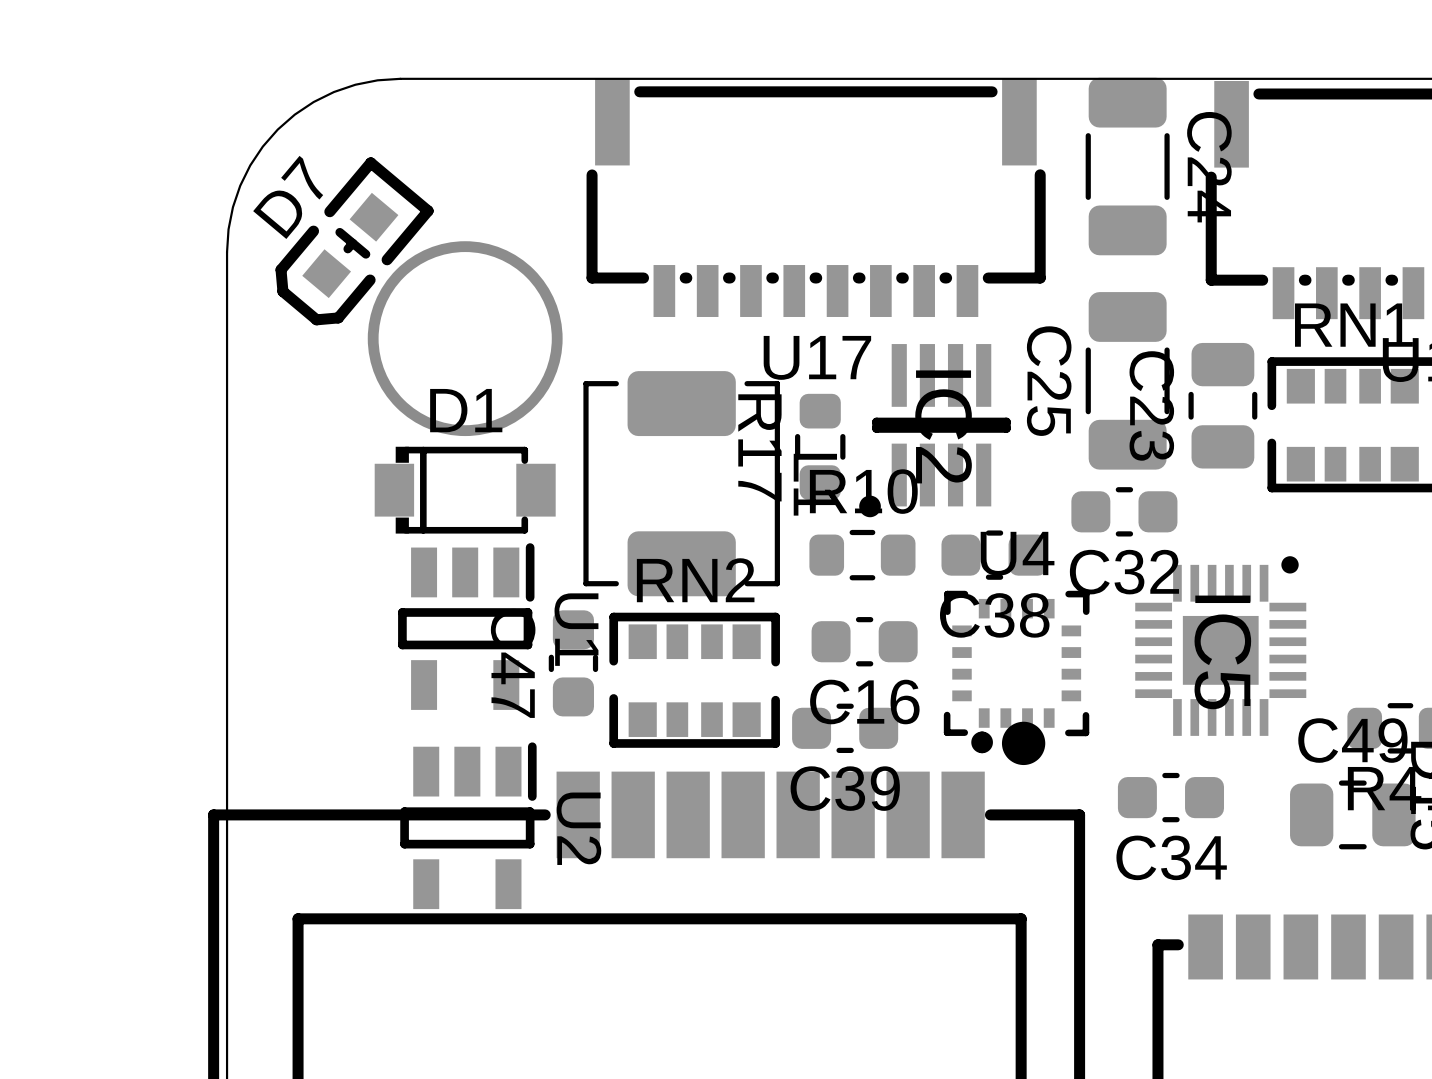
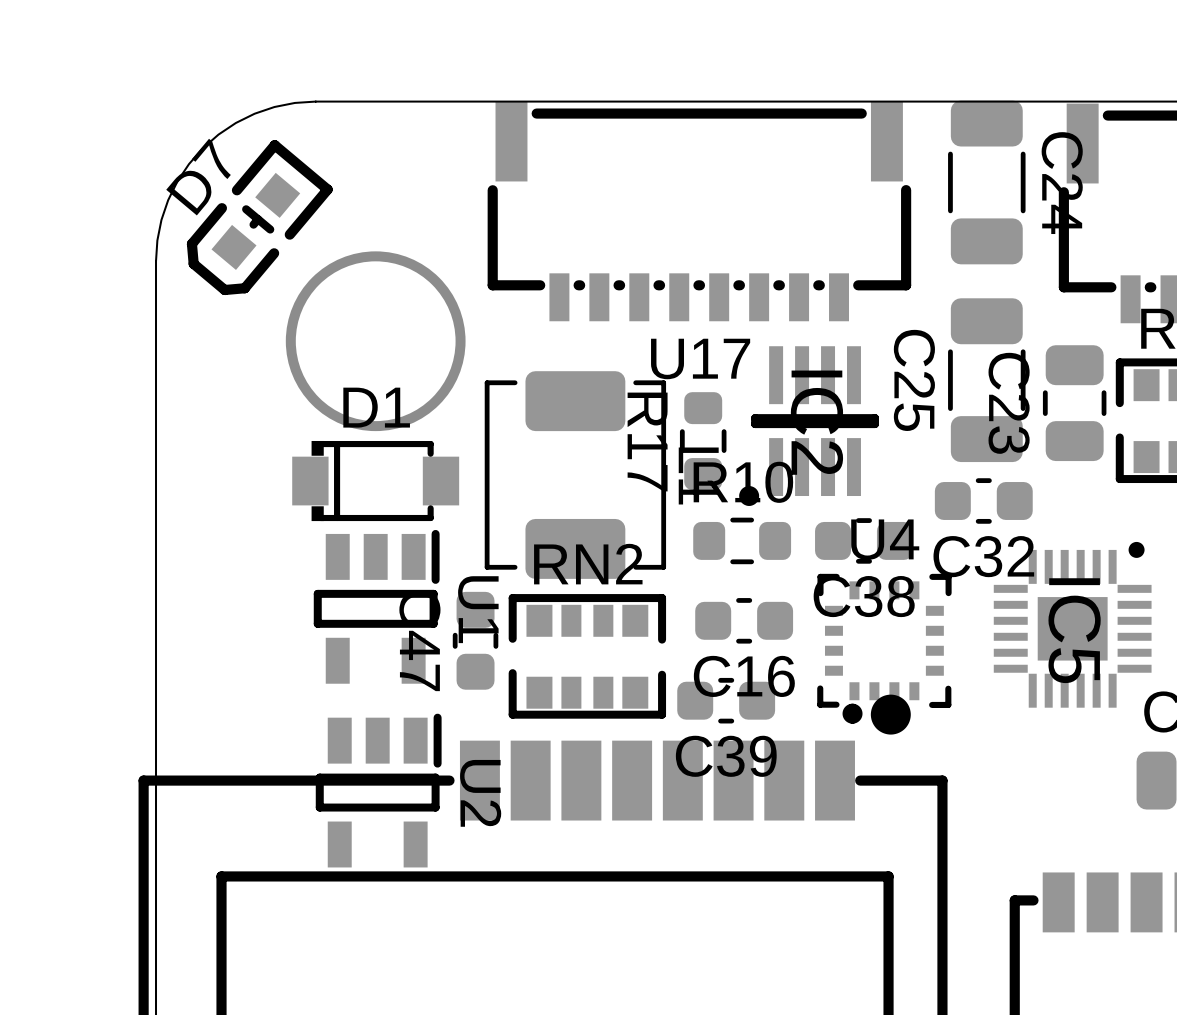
D7 position: (354, 241) -> (259, 217)
C34: (1170, 797) -> none

